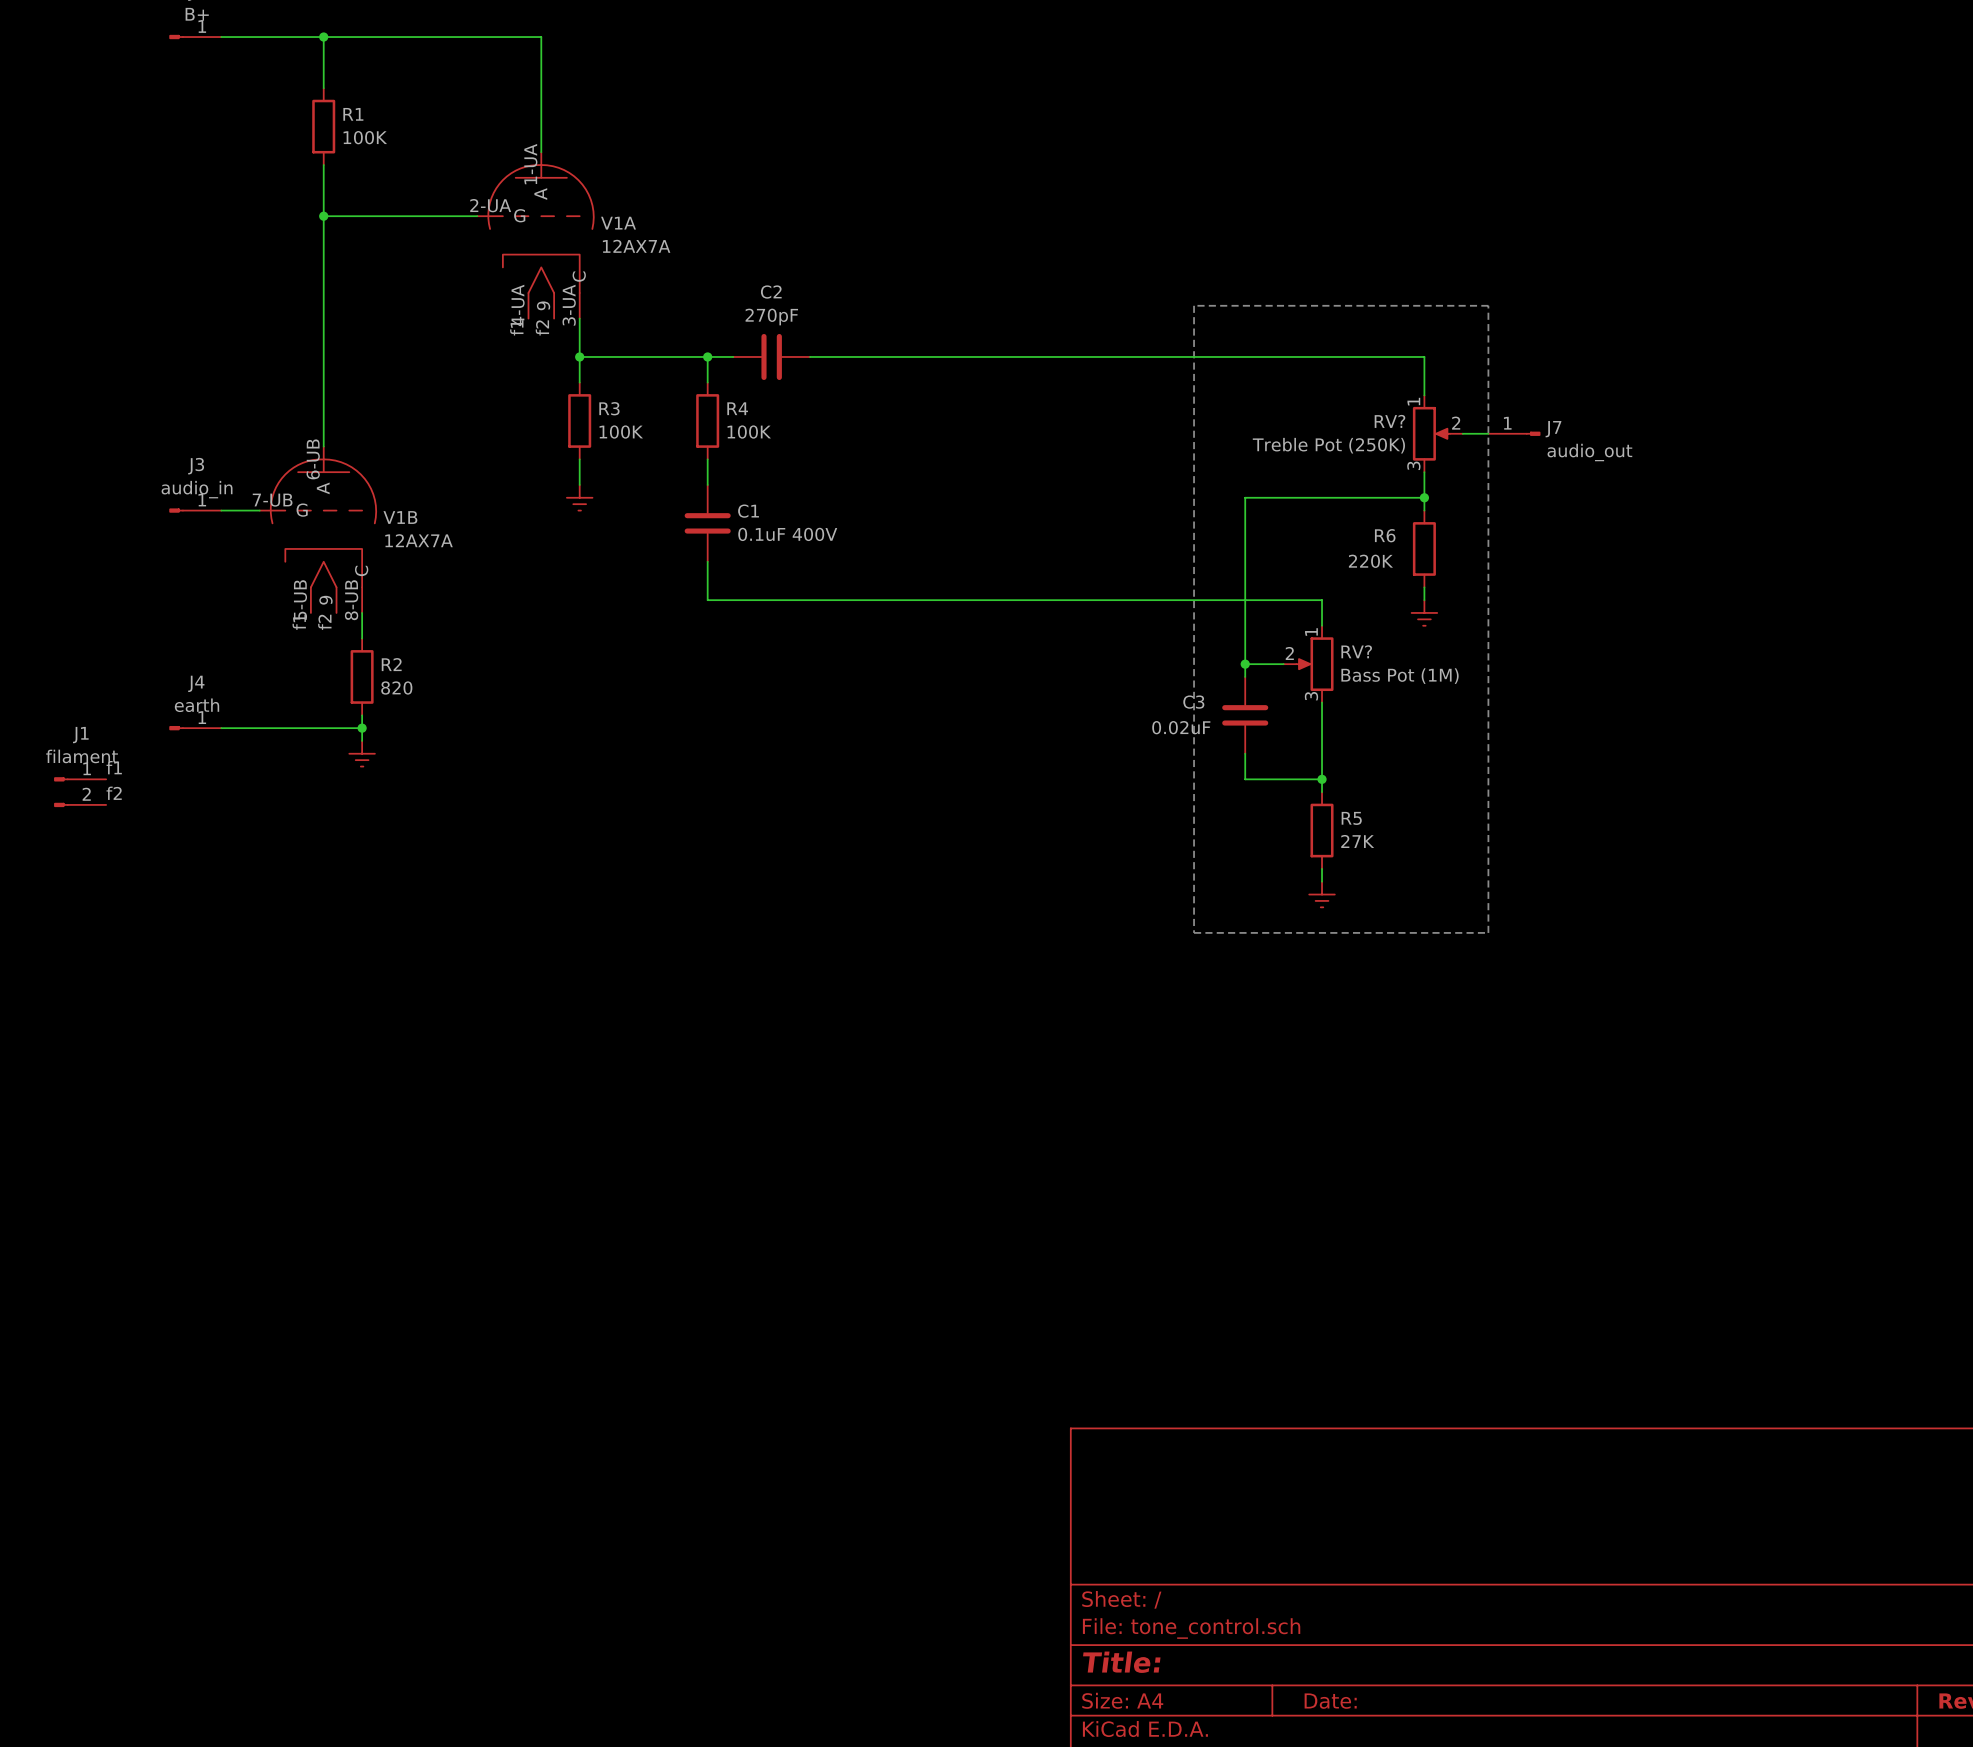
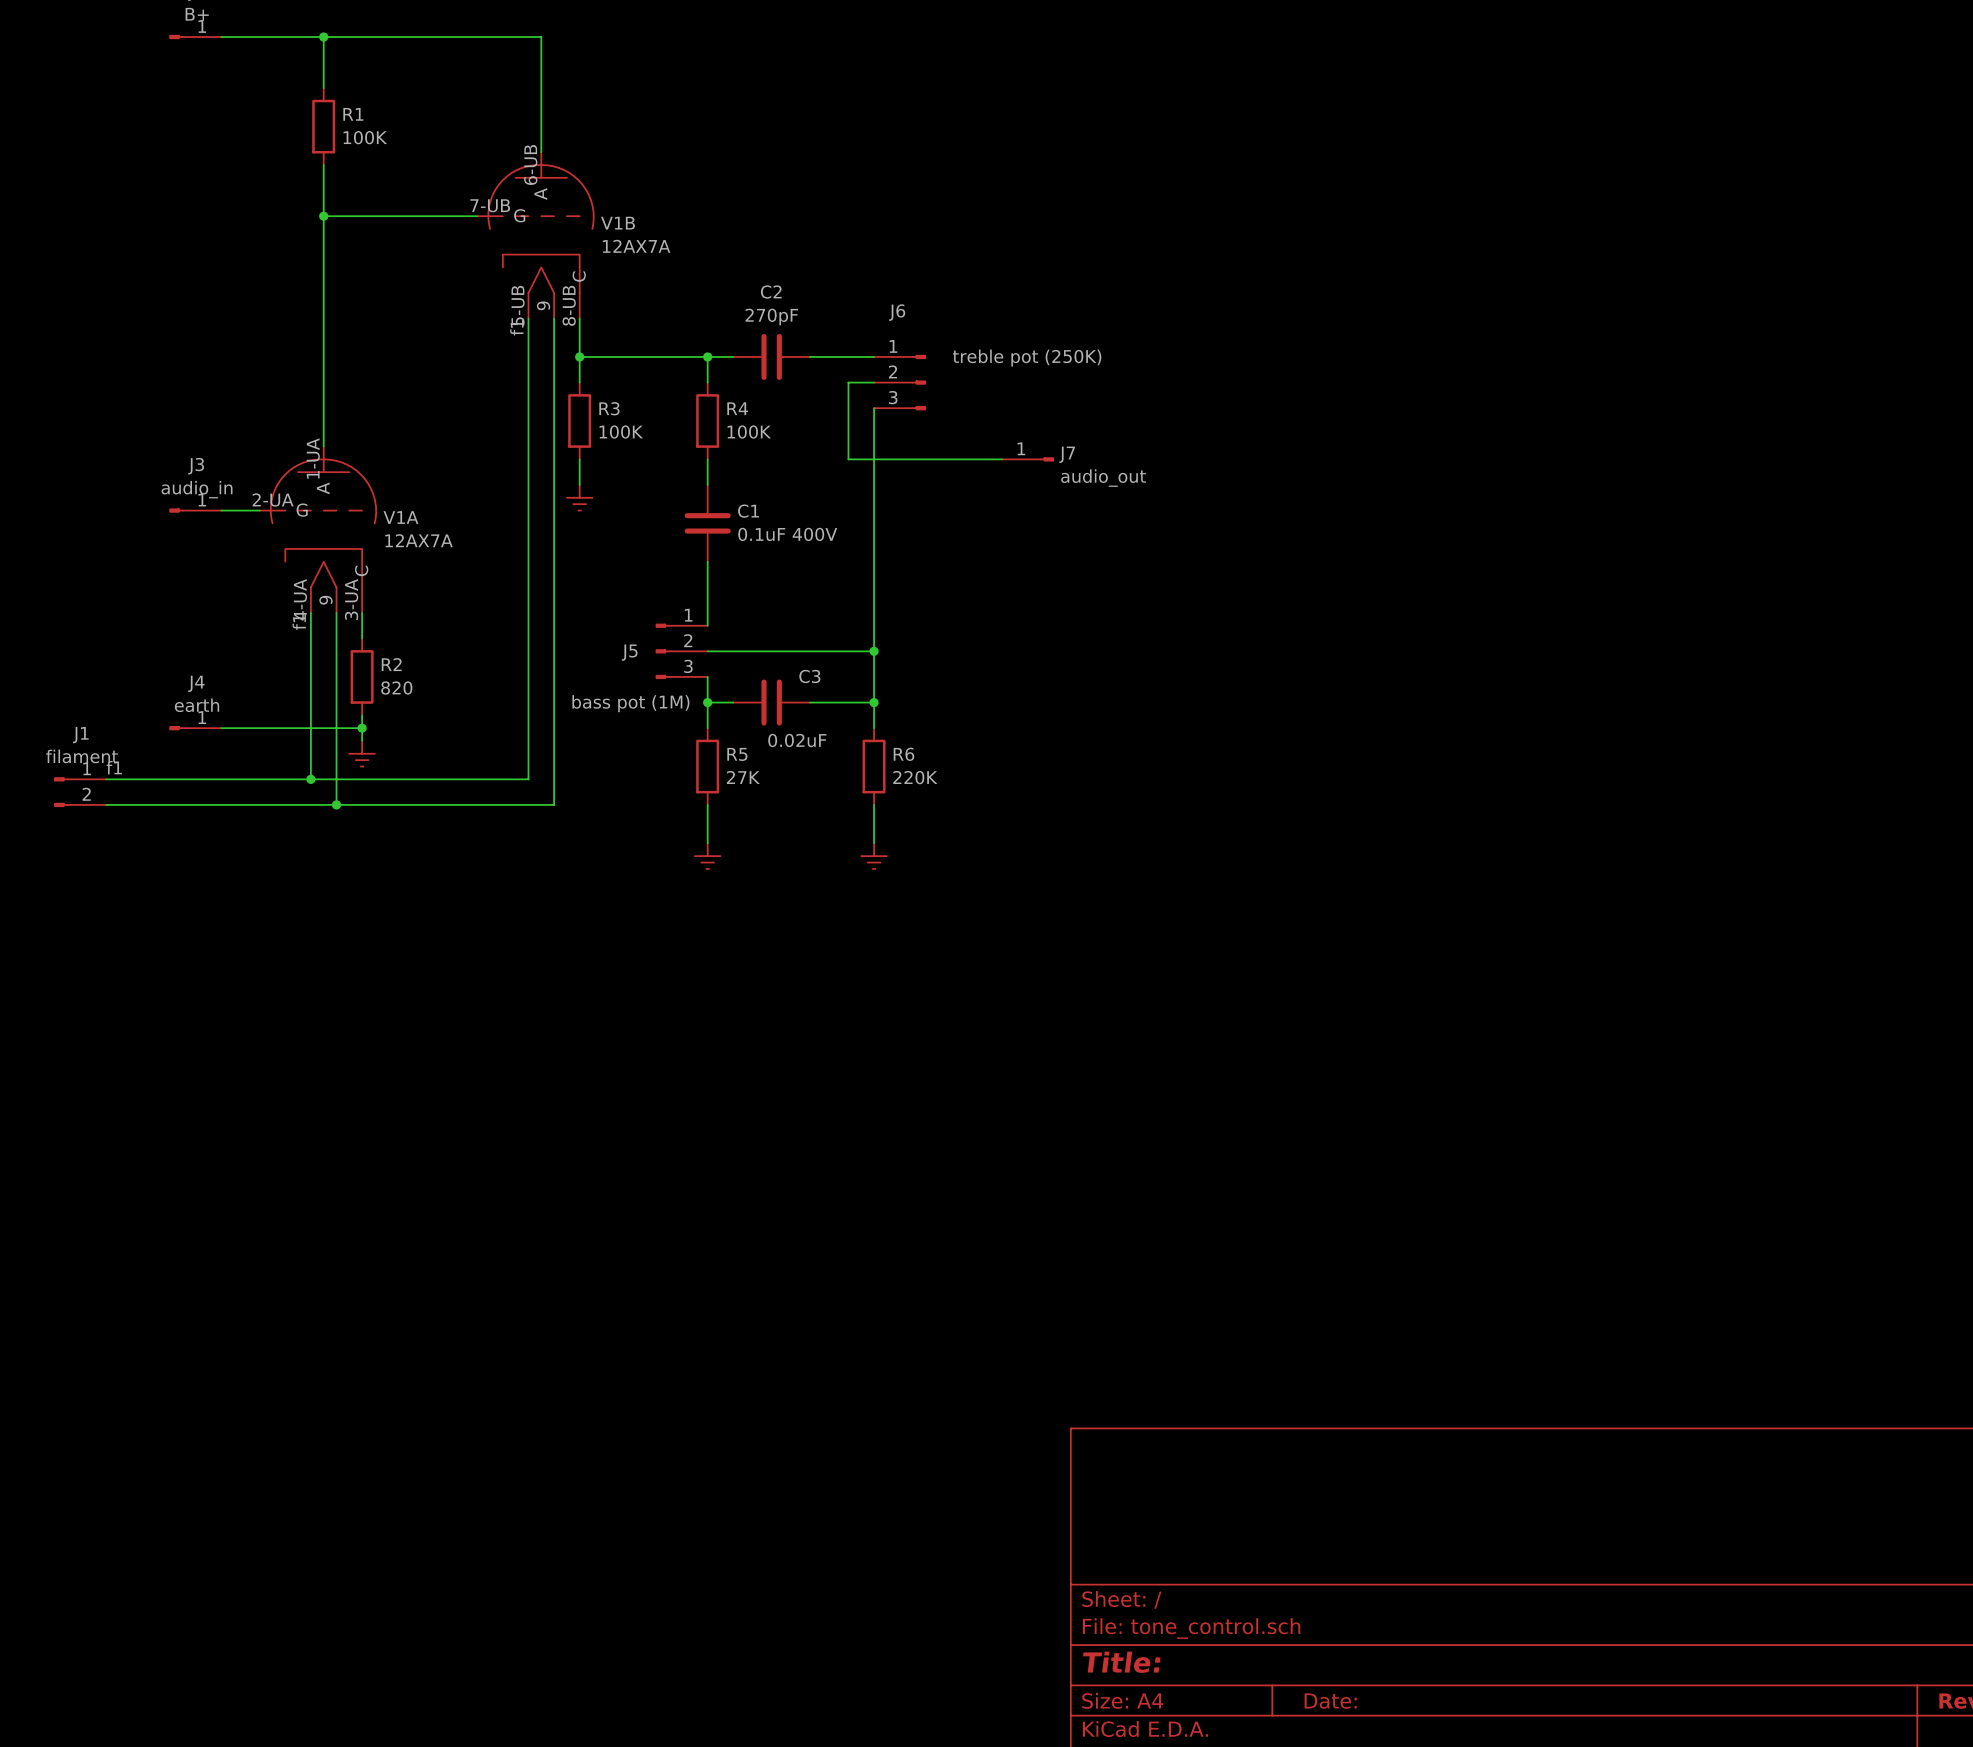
V1A position: (535, 235) -> (317, 529)
line: (1194, 305) (1488, 305) (1488, 932) (1194, 932) (1194, 305) -> none
wire: none -> (528, 318) (528, 779) (106, 779)
wire: none -> (554, 318) (554, 804) (106, 804)
label: f2 (542, 327) -> none
wire: (874, 356) (1424, 356) (1424, 395) -> none
wire: none -> (874, 382) (848, 382) (848, 459) (1002, 459)
J6: none -> treble pot (250K) (900, 382)
wire: none -> (874, 408) (874, 728)
RV?: Treble Pot (250K) (1437, 433) -> none
wire: (1462, 433) (1488, 433) -> none
J7 position: (1514, 433) -> (1028, 459)
wire: (1424, 472) (1424, 510) -> none
wire: (1424, 497) (1245, 497) (1245, 676) -> none
junction: (1424, 497) -> none
V1B position: (317, 529) -> (535, 235)
R6 name position: R6 (1385, 535) -> R6 (903, 754)
R6 position: (1424, 548) -> (874, 766)
R6 value position: 220K (1370, 561) -> 220K (915, 777)
wire: (1424, 587) (1424, 600) -> none
wire: (707, 600) (1322, 600) (1322, 625) -> (707, 600) (707, 625)
wire: none -> (310, 612) (310, 779)
wire: none -> (336, 612) (336, 804)
power symbol: (1424, 612) -> none
label: f2 (324, 622) -> none
J5: none -> bass pot (1M) (681, 651)
wire: none -> (707, 651) (874, 651)
junction: none -> (874, 651)
wire: (1245, 664) (1283, 664) -> none
junction: (1245, 664) -> none
RV?: Bass Pot (1M) (1308, 664) -> none
wire: none -> (707, 676) (707, 728)
wire: none -> (707, 702) (733, 702)
junction: none -> (707, 702)
wire: none -> (810, 702) (874, 702)
junction: none -> (874, 702)
C3 name position: C3 (1193, 702) -> C3 (809, 676)
wire: (1322, 702) (1322, 792) -> none
C3 rotation: 0° (1245, 715) -> 90° clockwise (771, 702)
C3 position: (1245, 715) -> (771, 702)
C3 value position: 0.02uF (1181, 727) -> 0.02uF (797, 740)
wire: (1245, 753) (1245, 779) (1322, 779) -> none
junction: none -> (310, 779)
junction: (1322, 779) -> none
label: f2 (114, 793) -> none
junction: none -> (336, 804)
wire: none -> (707, 804) (707, 843)
wire: none -> (874, 804) (874, 843)
R5 position: (1322, 830) -> (707, 766)
power symbol: none -> (707, 856)
power symbol: none -> (874, 856)
wire: (1322, 868) (1322, 881) -> none
power symbol: (1322, 894) -> none

